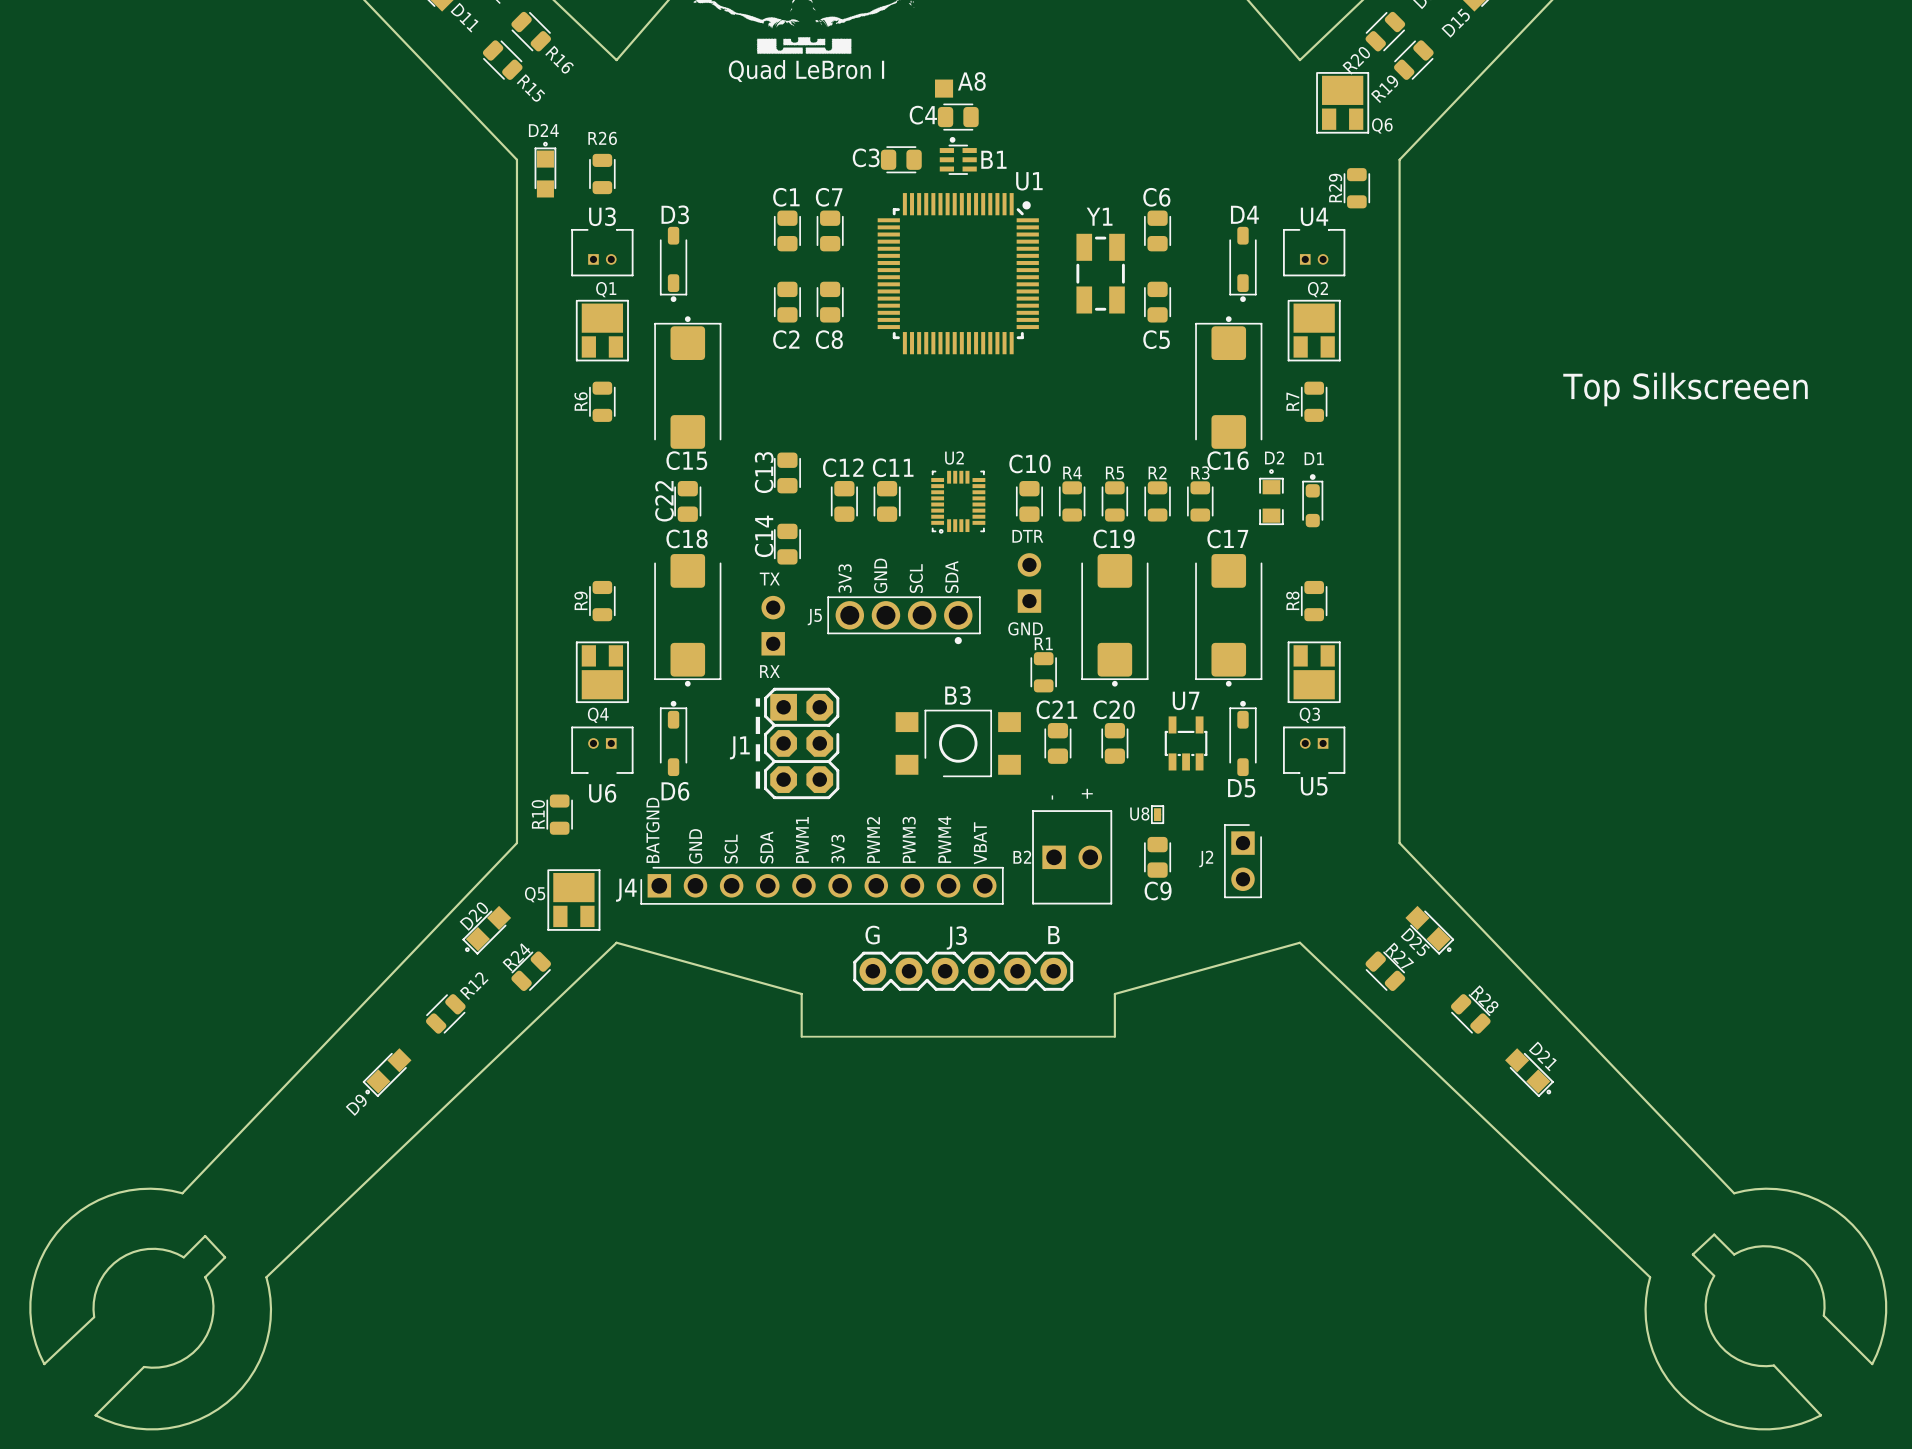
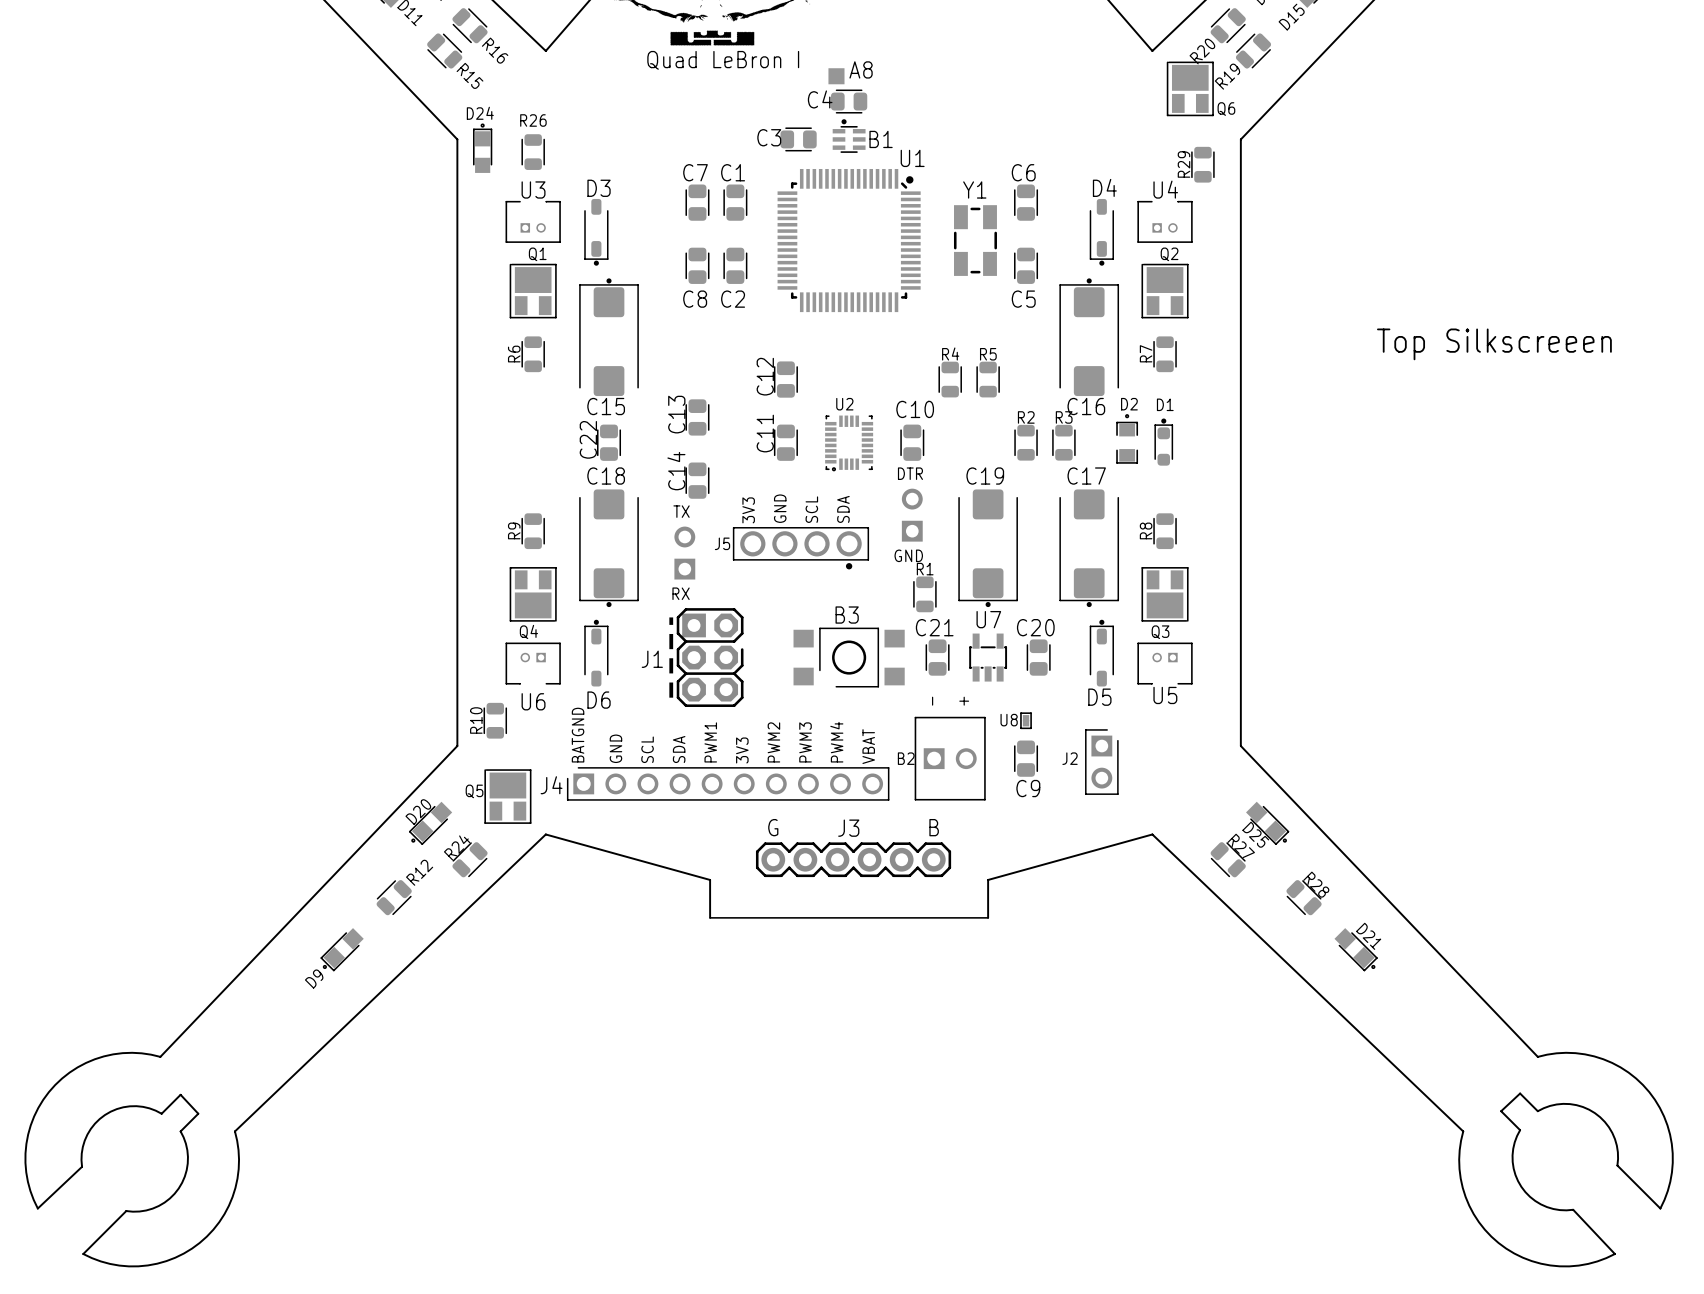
C1 name: C1 (786, 197) -> C7 (695, 172)
C7 name: C7 (829, 197) -> C1 (733, 172)
C2 name: C2 (786, 339) -> C8 (695, 299)
C8 name: C8 (829, 339) -> C2 (733, 299)
C12 name rotation: 0° (843, 467) -> 90° counterclockwise (765, 376)
C11 name rotation: 0° (893, 467) -> 90° counterclockwise (765, 433)
C12 position: (844, 501) -> (785, 379)
R4 position: (1072, 501) -> (950, 379)
R5 position: (1114, 501) -> (988, 379)
C20 position: (1114, 743) -> (1038, 657)
U7 position: (1186, 743) -> (988, 657)

